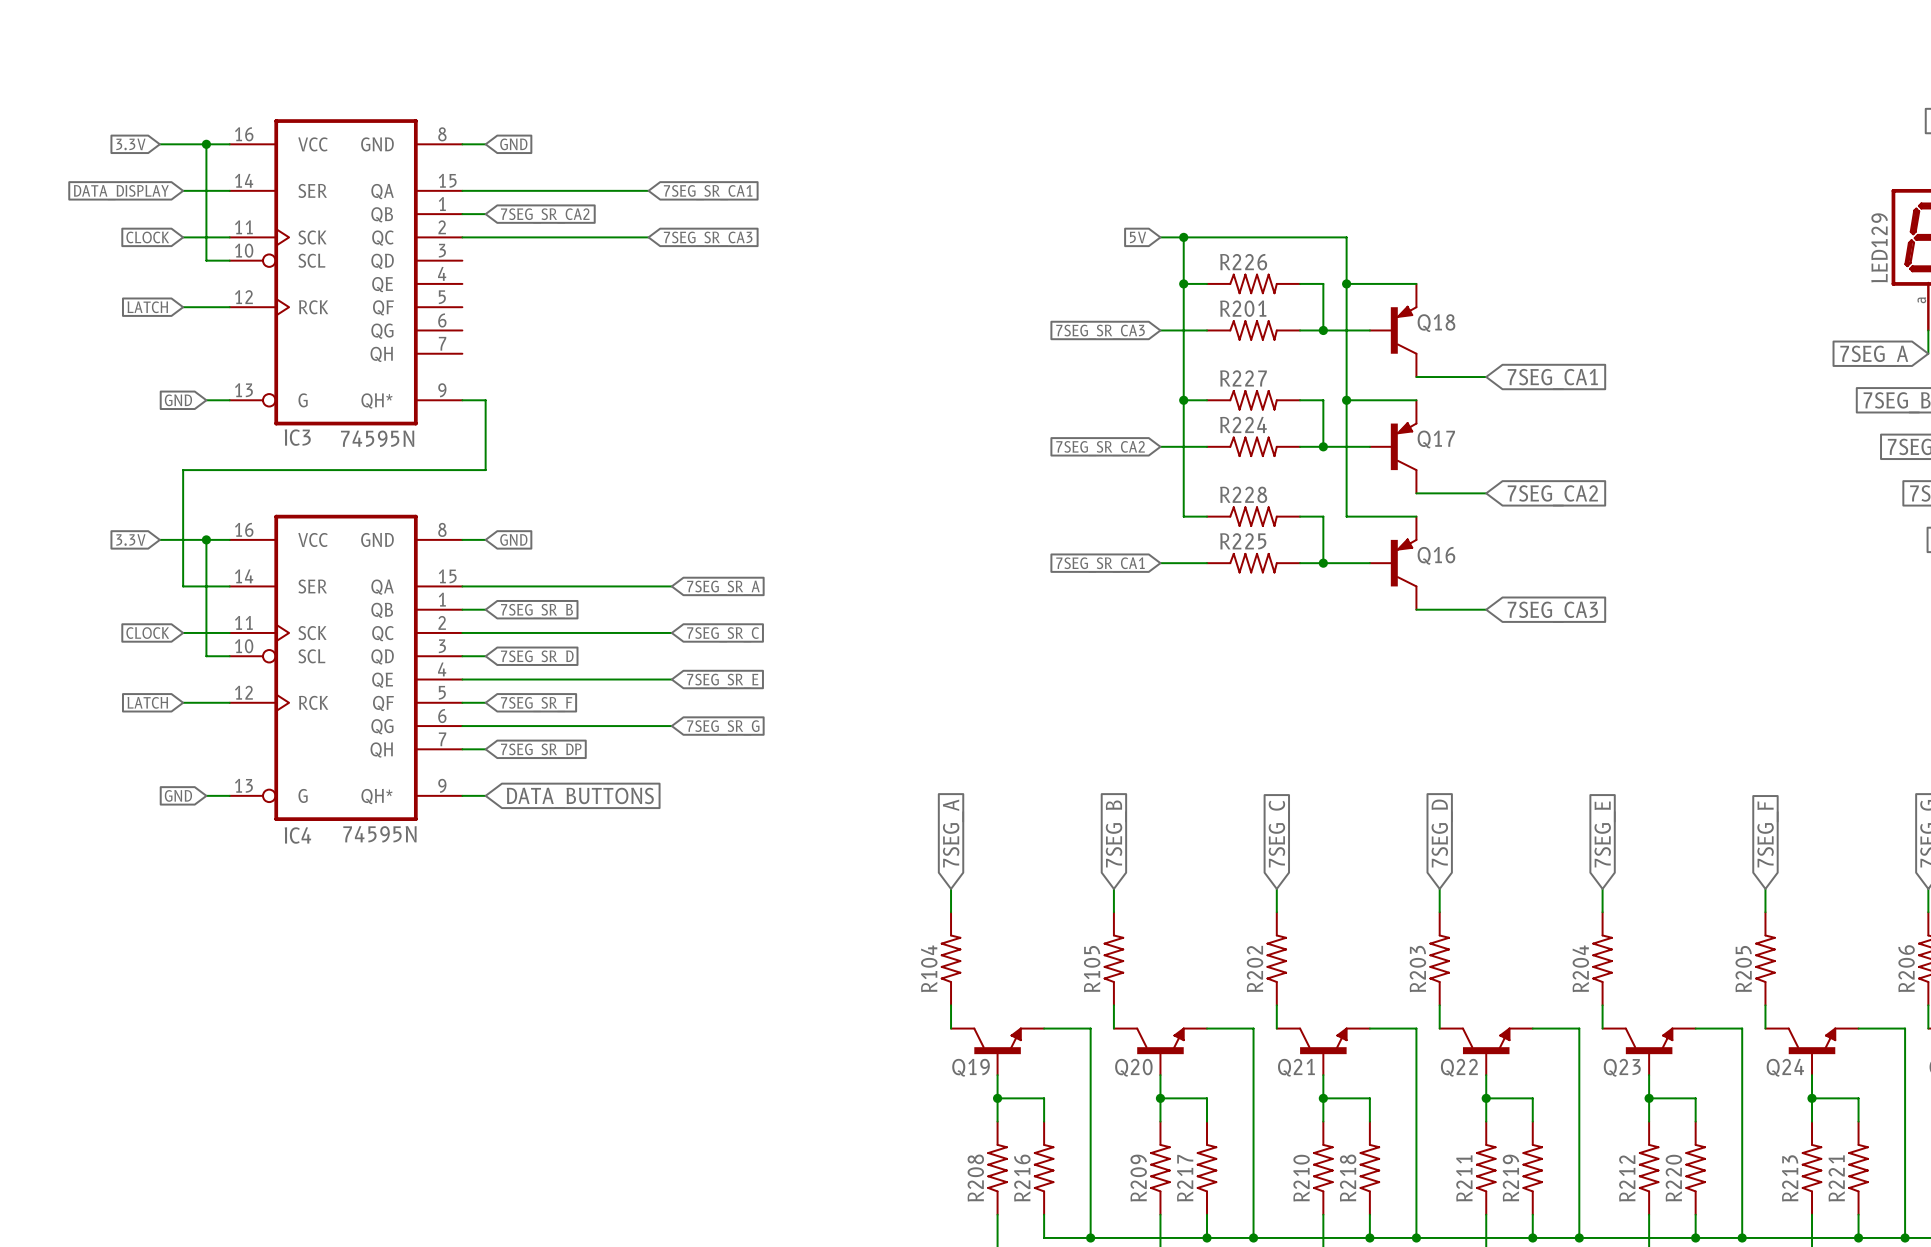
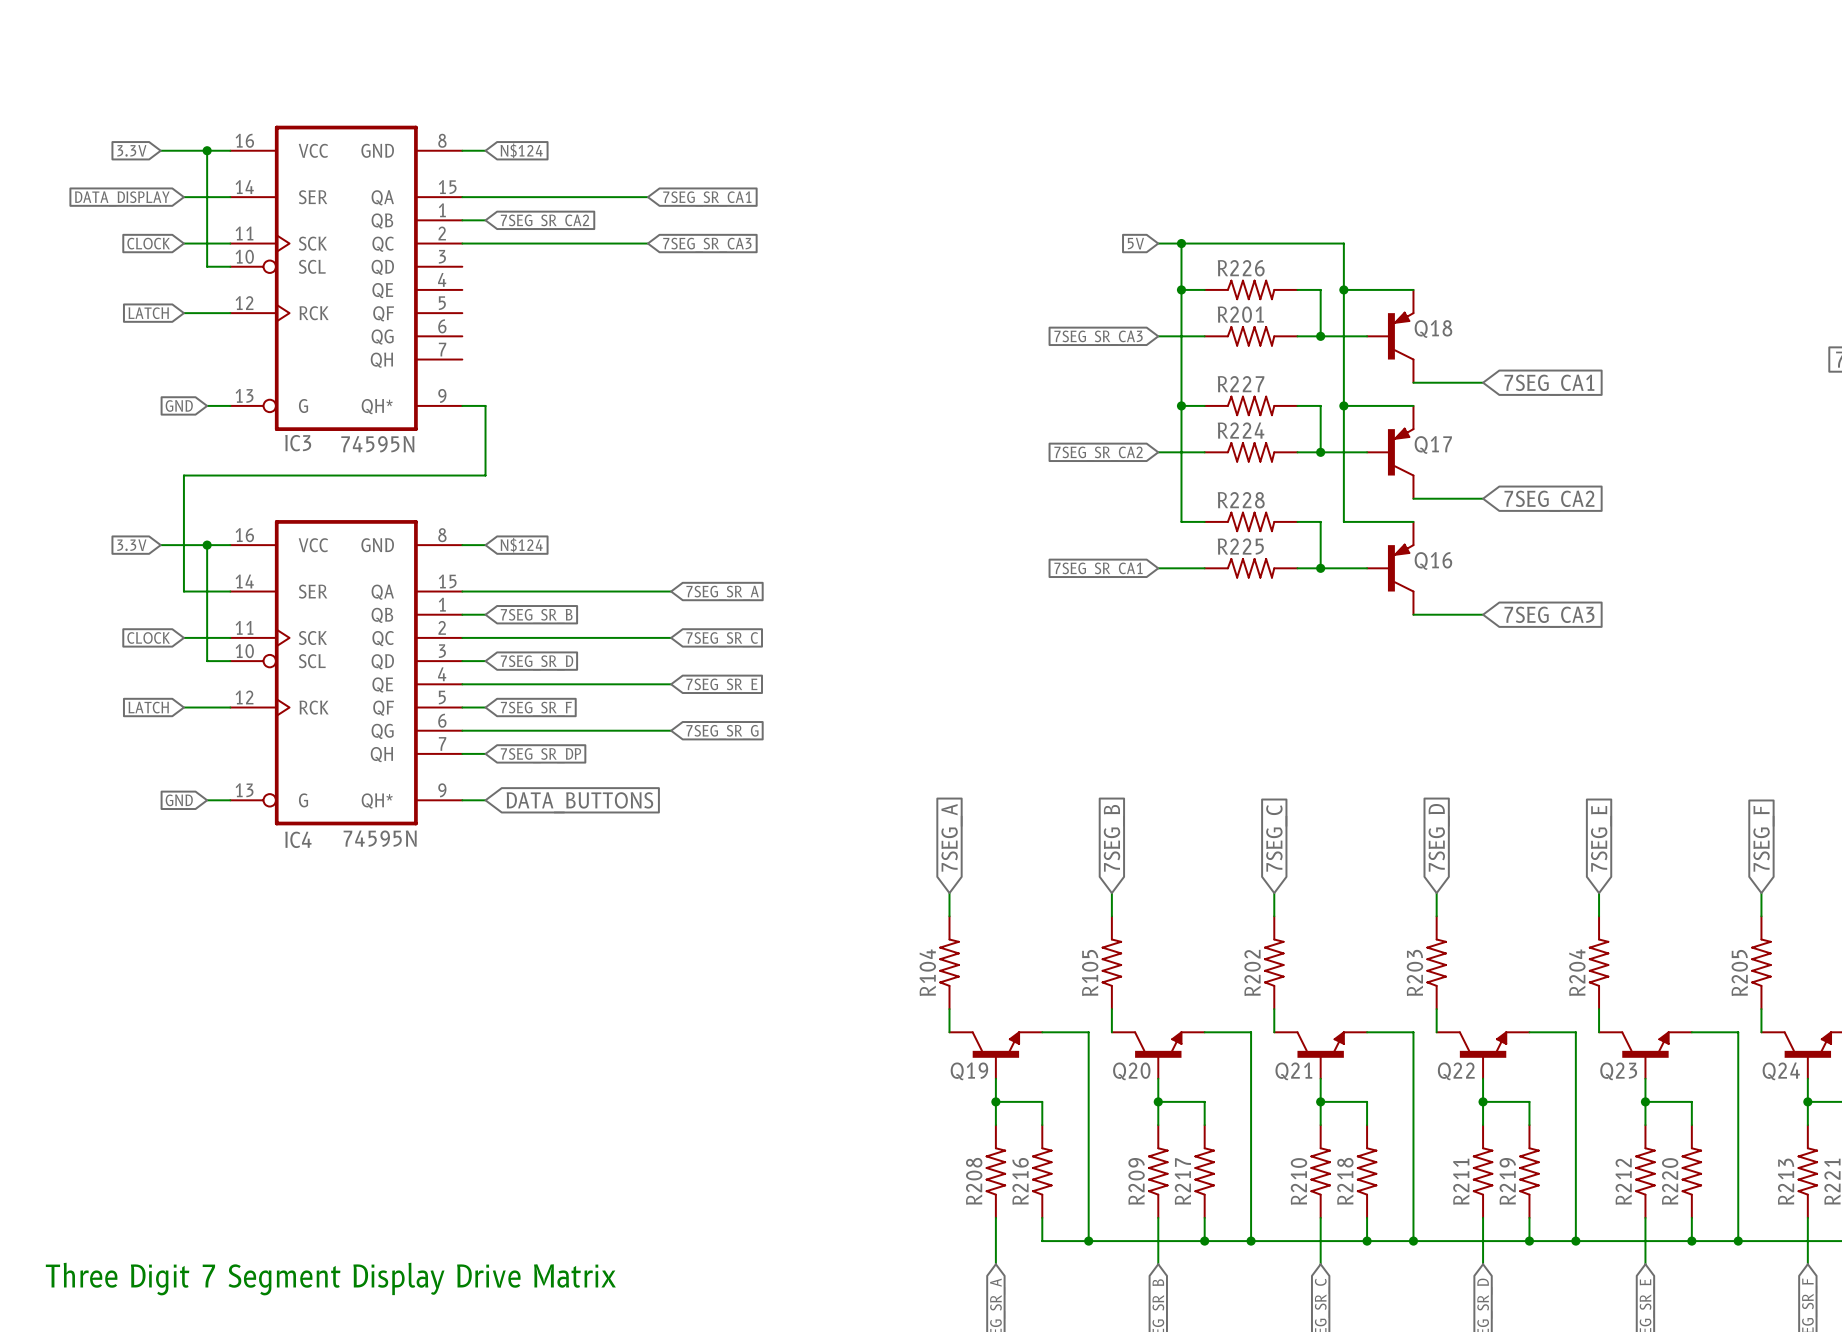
global label: GND (513, 144) -> N$124 (521, 150)
global label: GND (513, 539) -> N$124 (521, 545)

